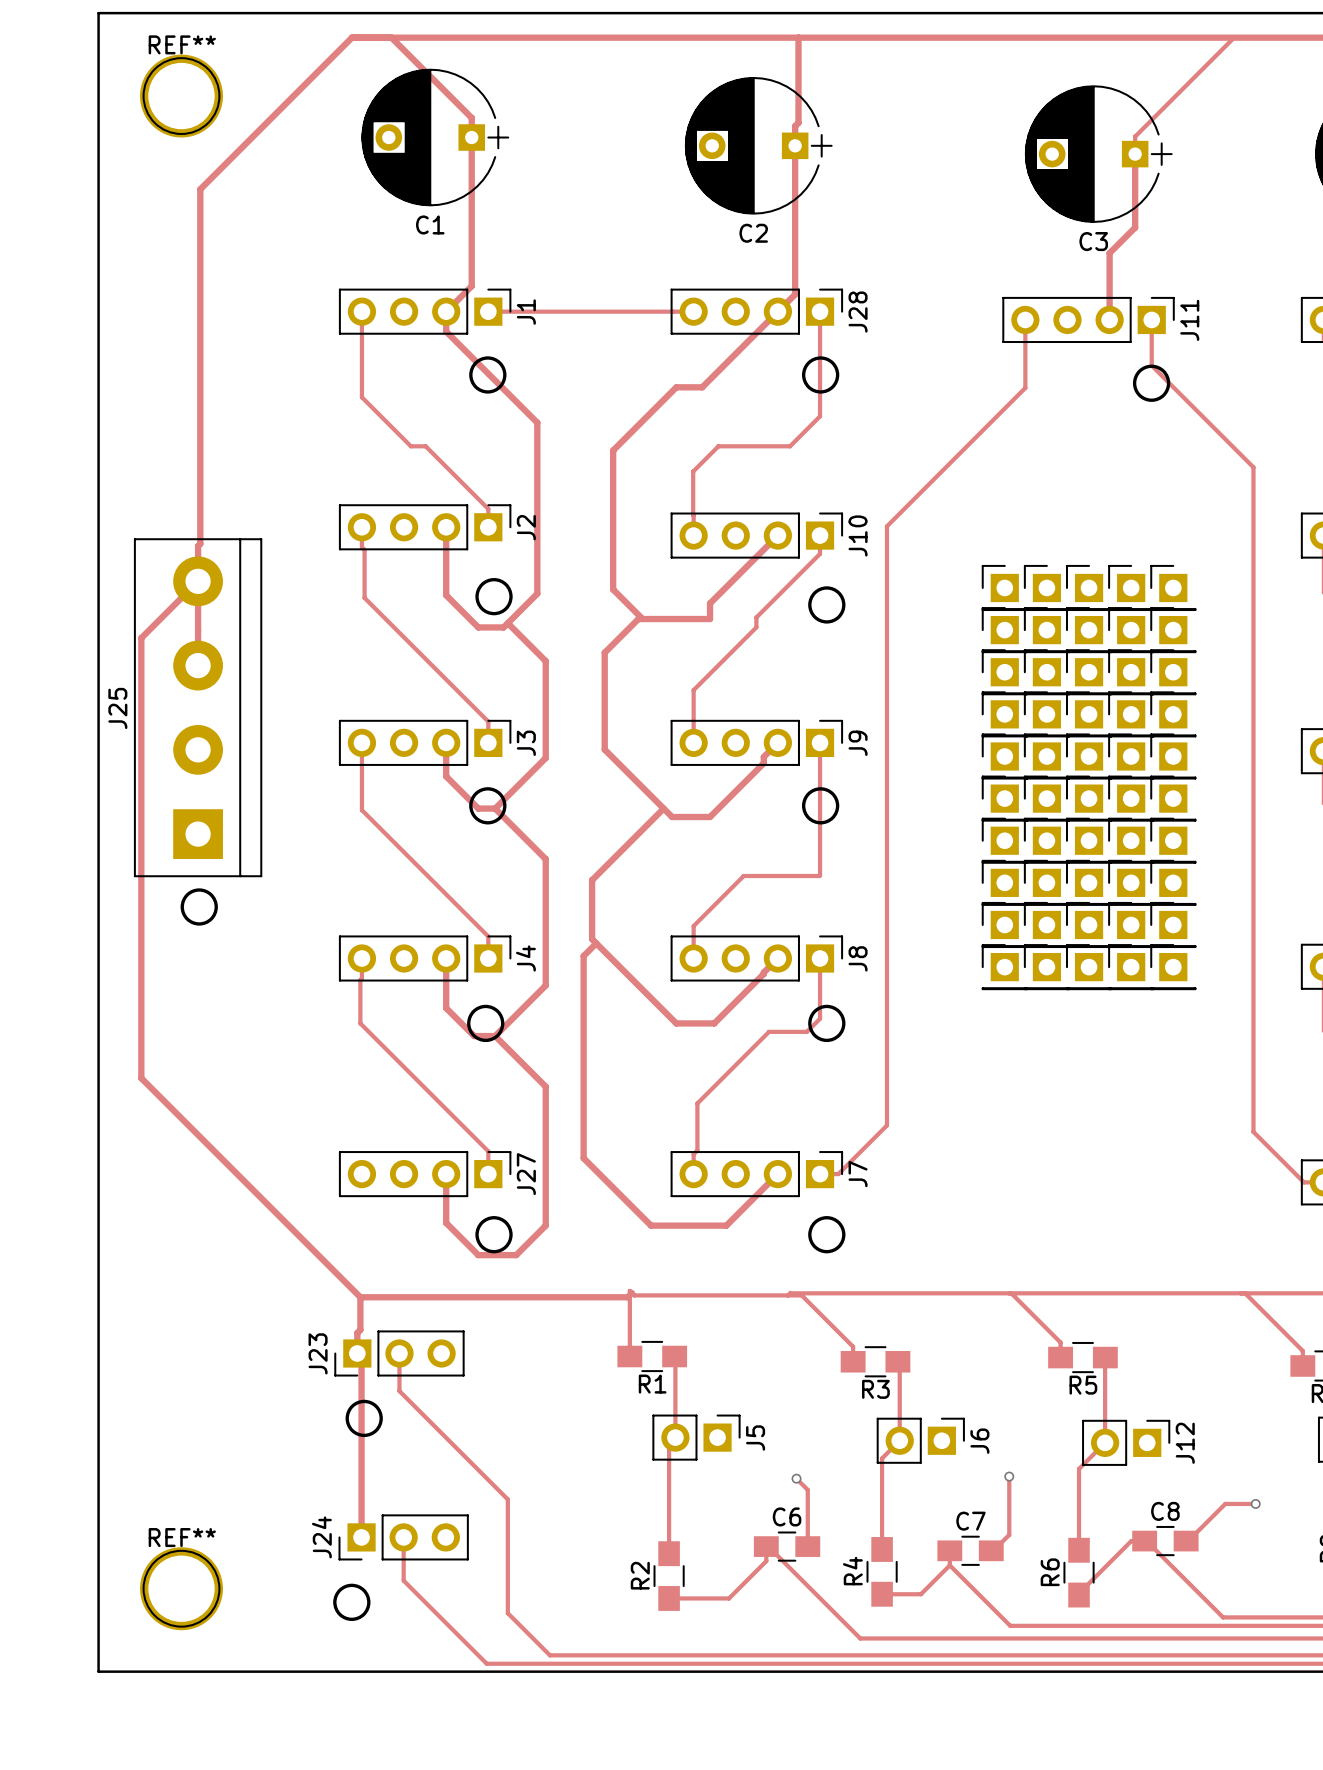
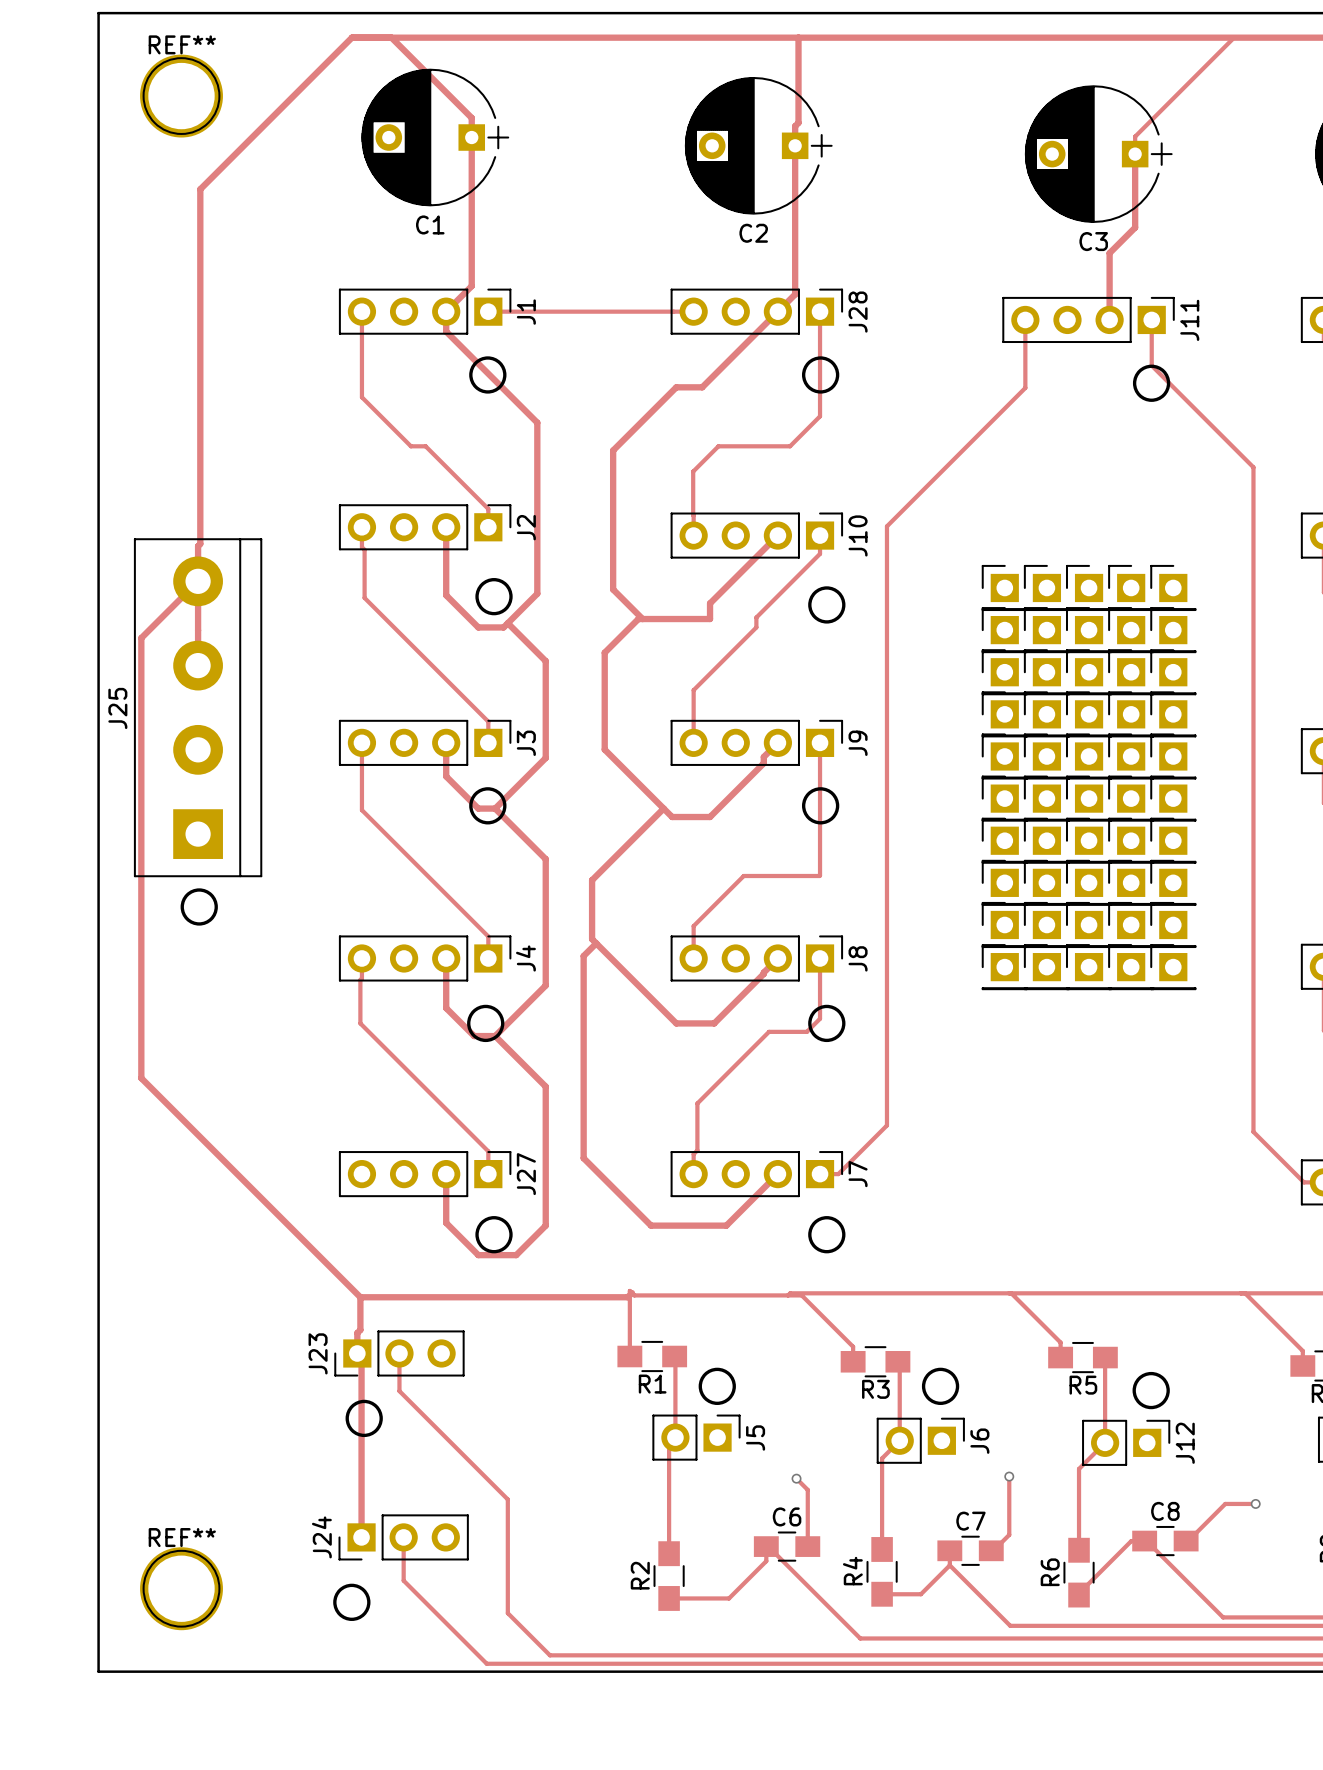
drawing: none -> [698, 1367, 736, 1405]
drawing: none -> [921, 1367, 960, 1405]
drawing: none -> [1132, 1371, 1170, 1410]

